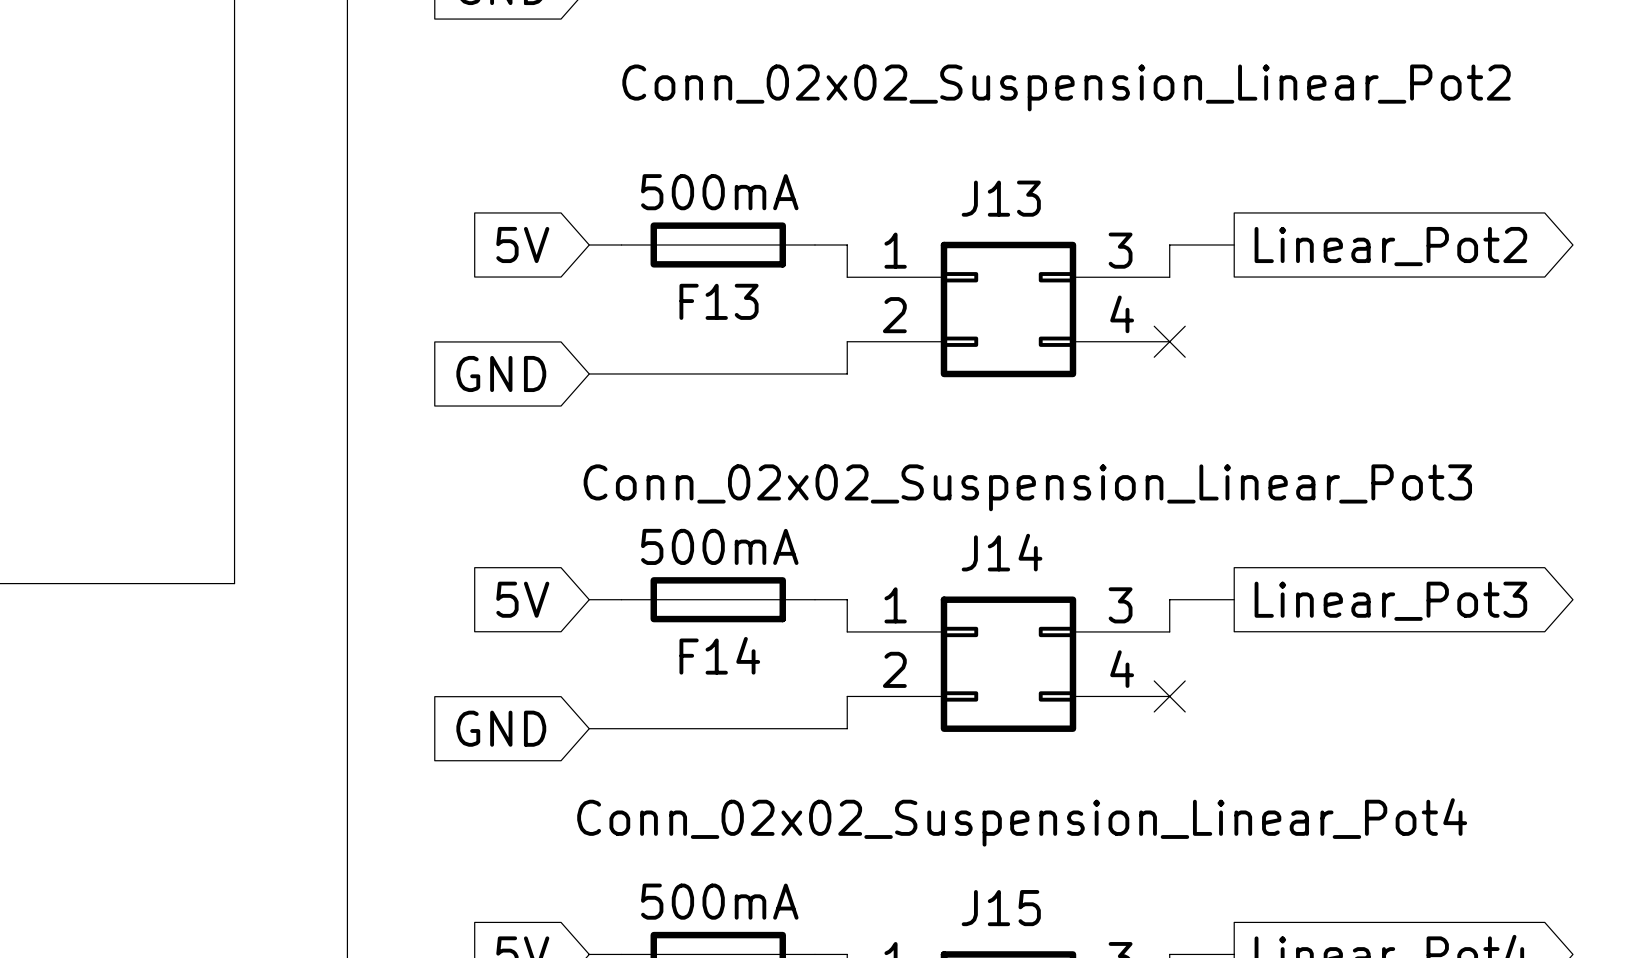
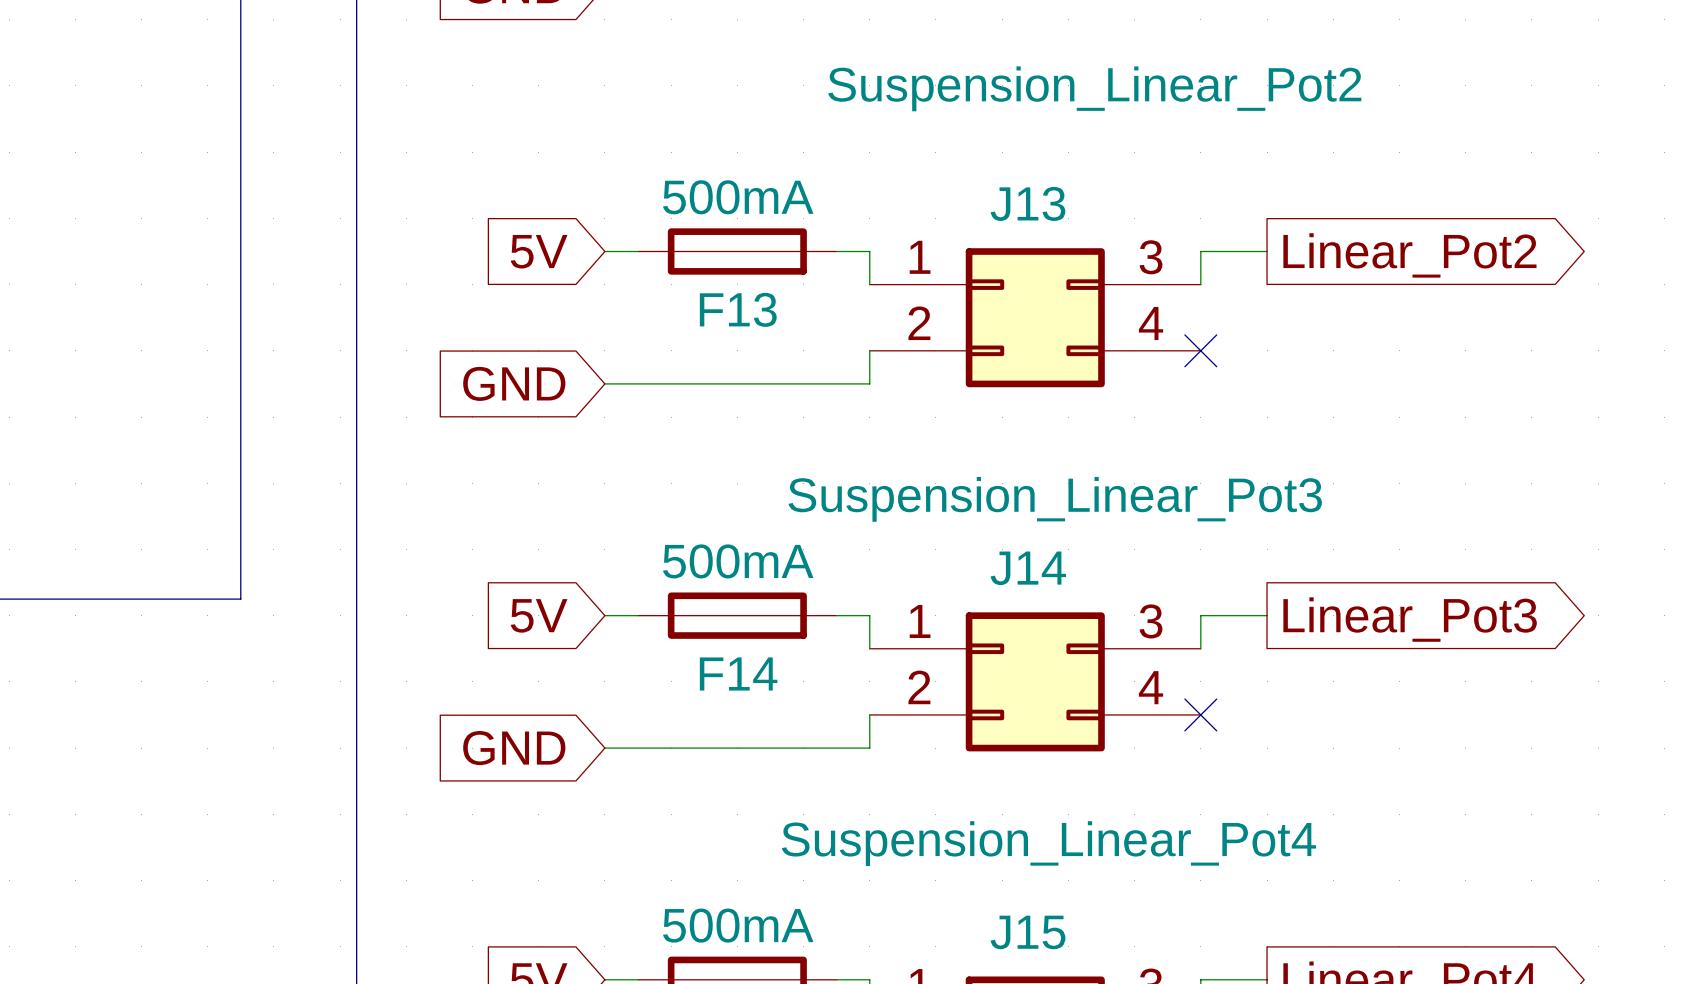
J13 value: Conn_02x02_Suspension_Linear_Pot2 (1066, 87) -> Suspension_Linear_Pot2 (1094, 88)
J14 value: Conn_02x02_Suspension_Linear_Pot3 (1027, 487) -> Suspension_Linear_Pot3 (1055, 499)
J15 value: Conn_02x02_Suspension_Linear_Pot4 (1022, 822) -> Suspension_Linear_Pot4 (1048, 843)

